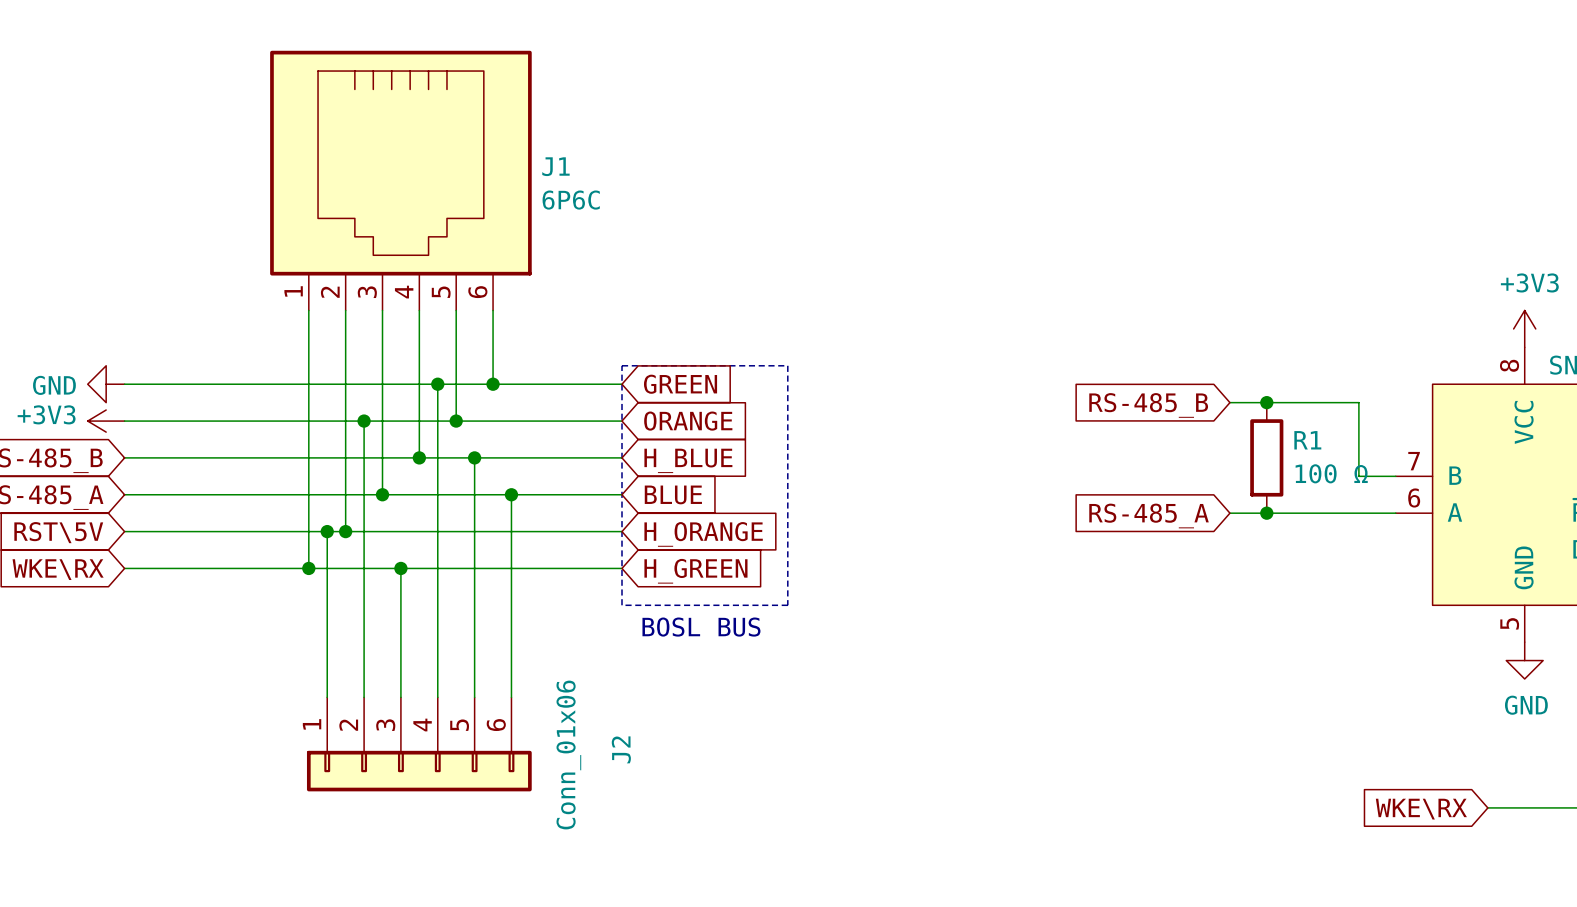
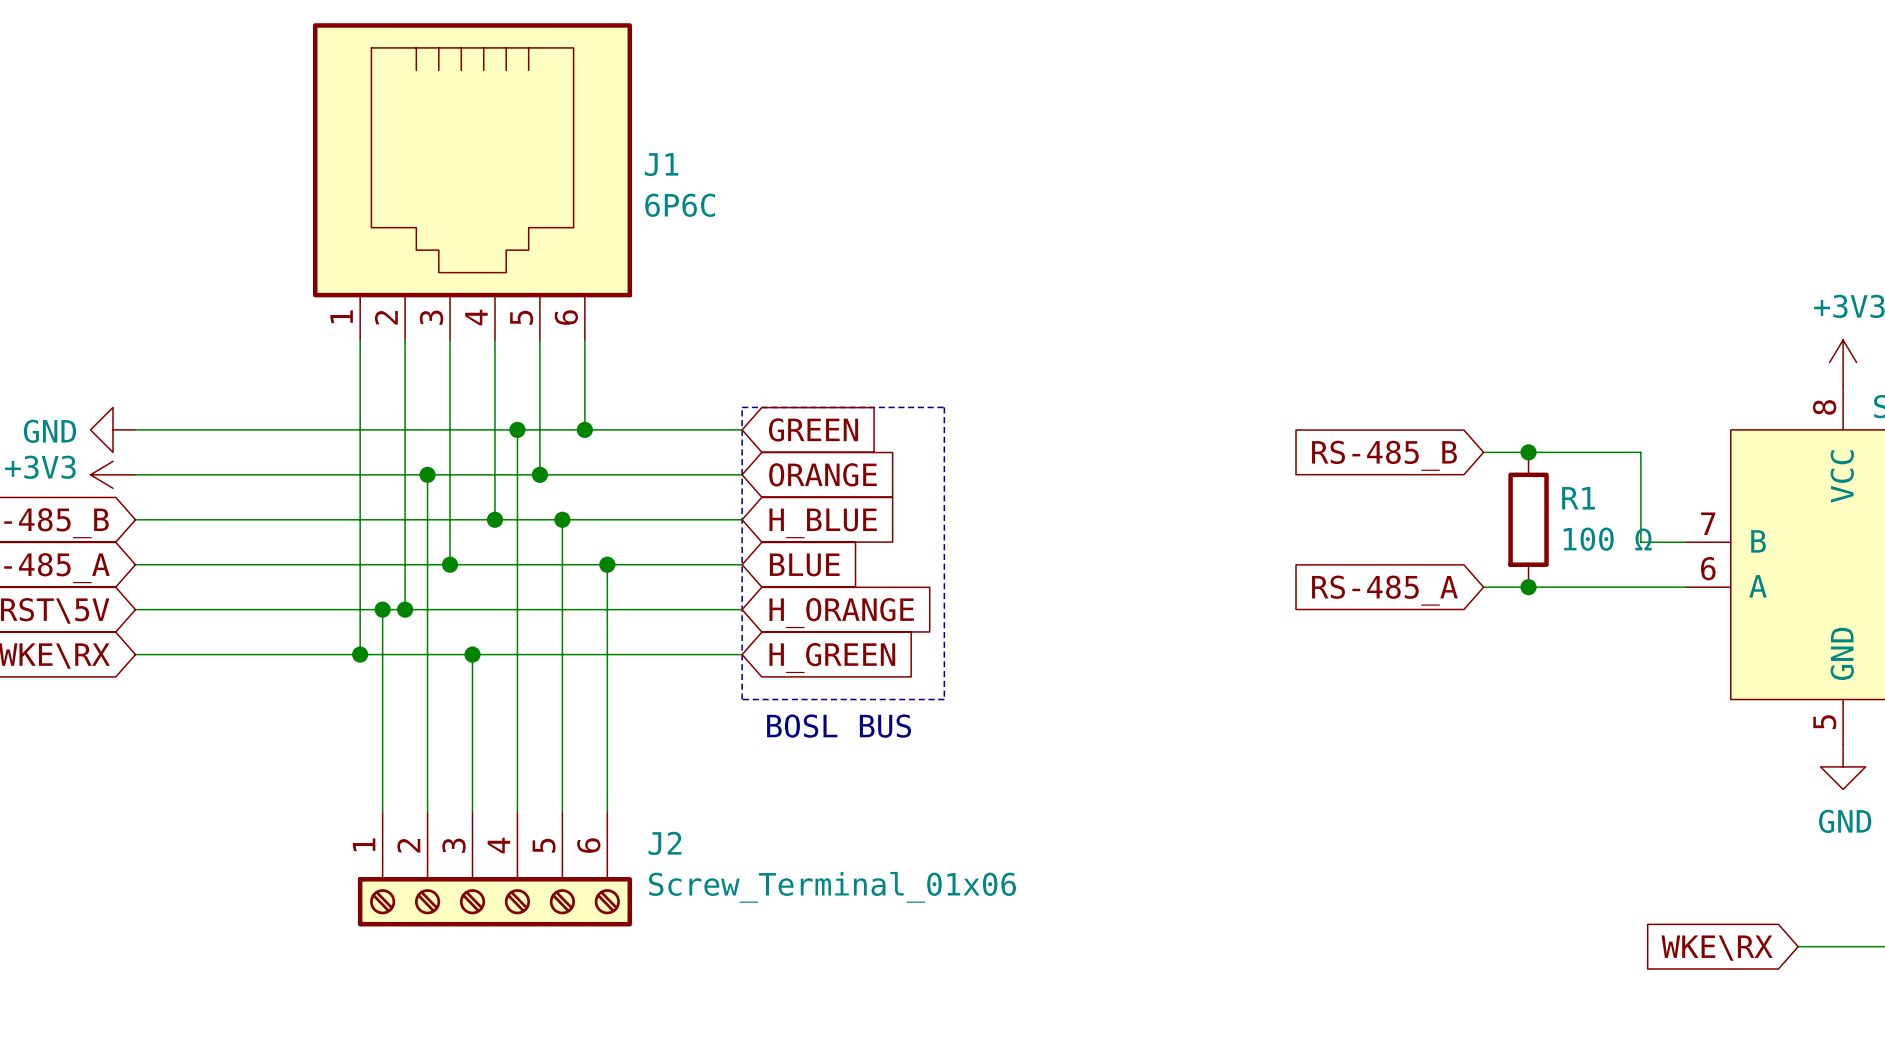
J2 symbol: [306, 697, 532, 792] -> [357, 811, 633, 927]
J2 name rotation: 0° (621, 749) -> 90° clockwise (664, 843)
J2 name position: J2 (621, 749) -> J2 (664, 843)
J2 value: Conn_01x06 (568, 755) -> Screw_Terminal_01x06 (832, 887)

